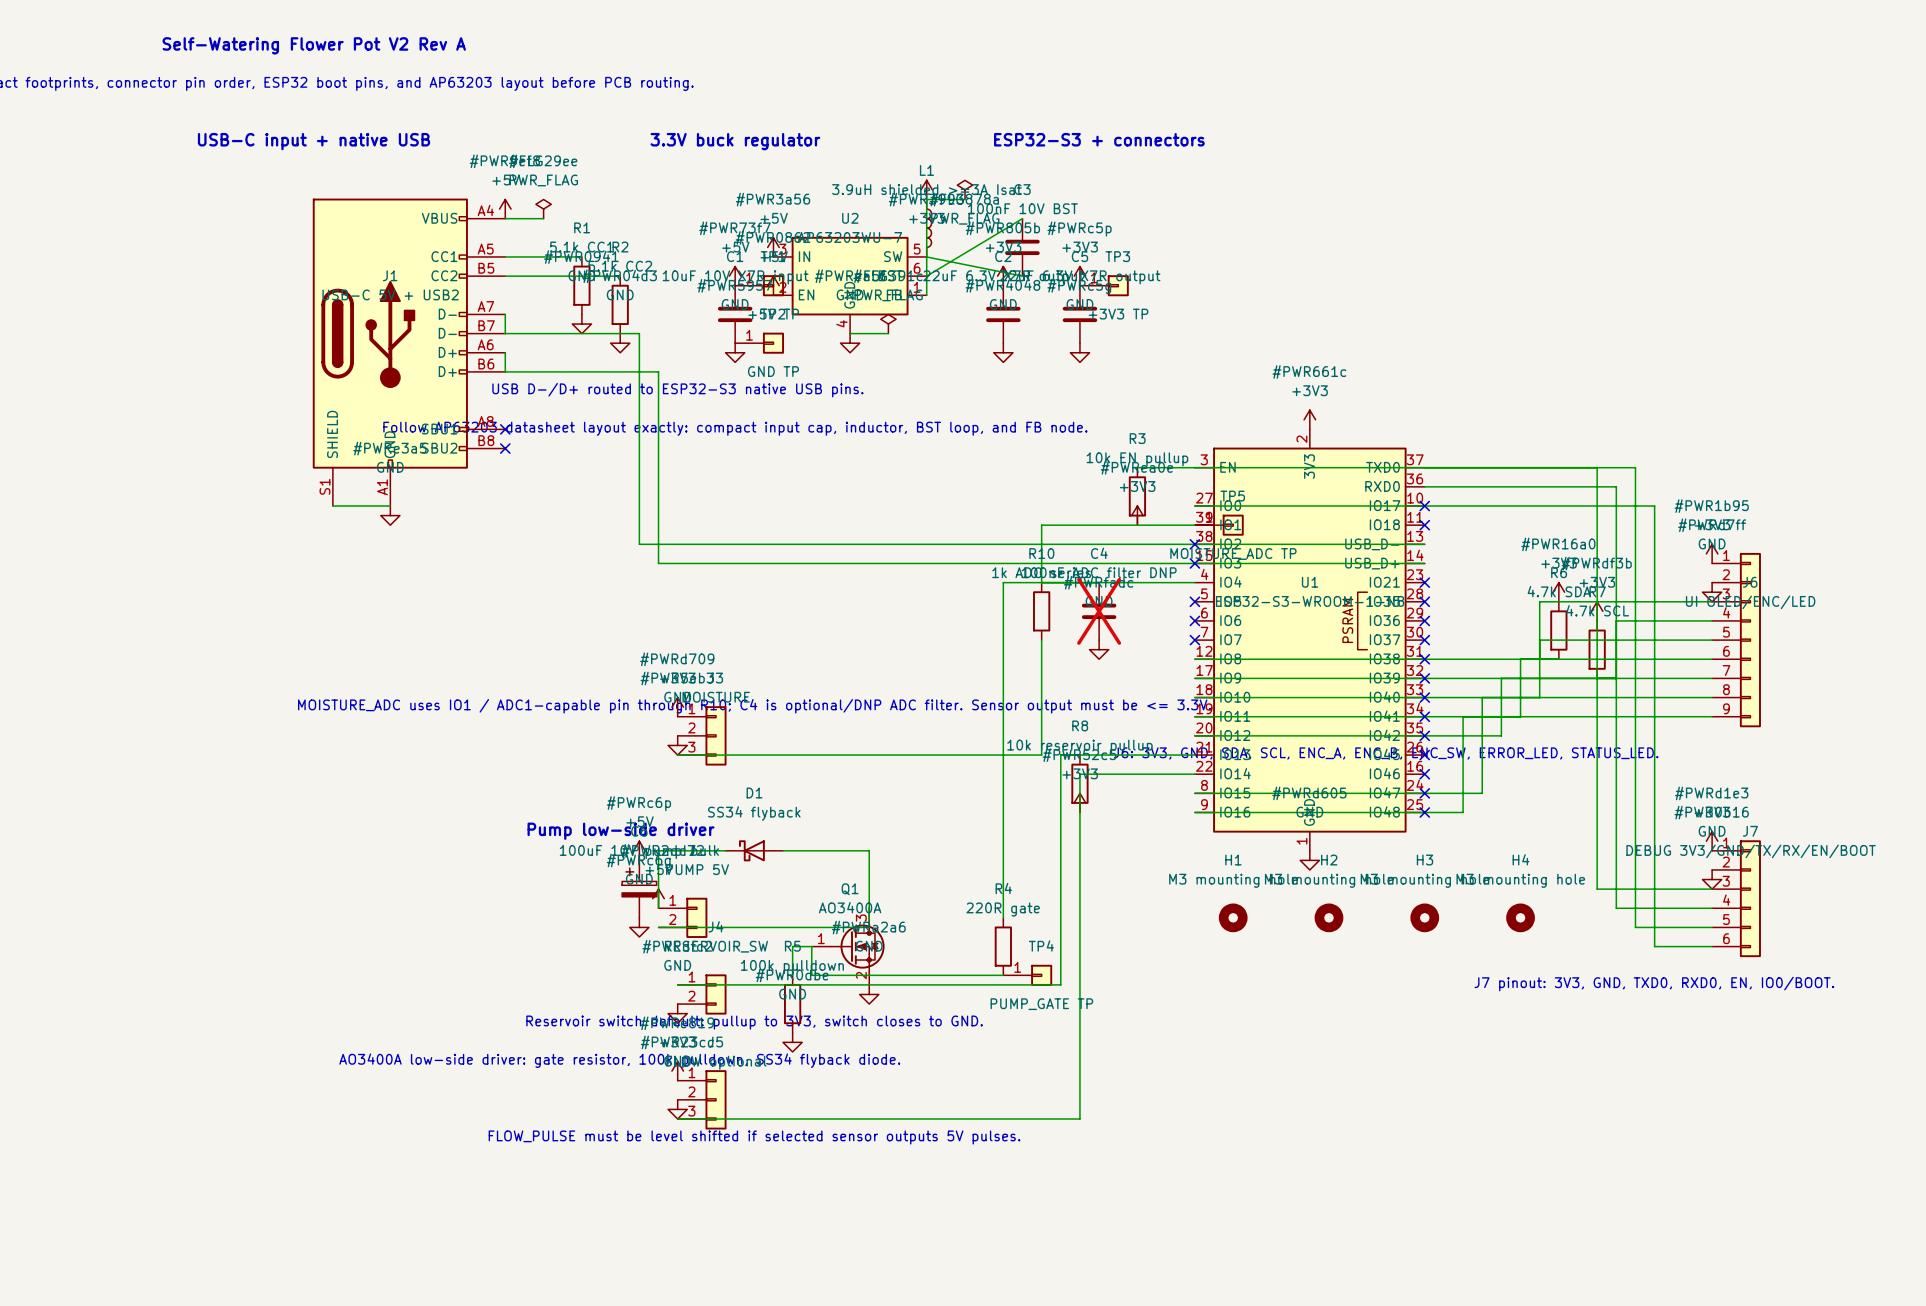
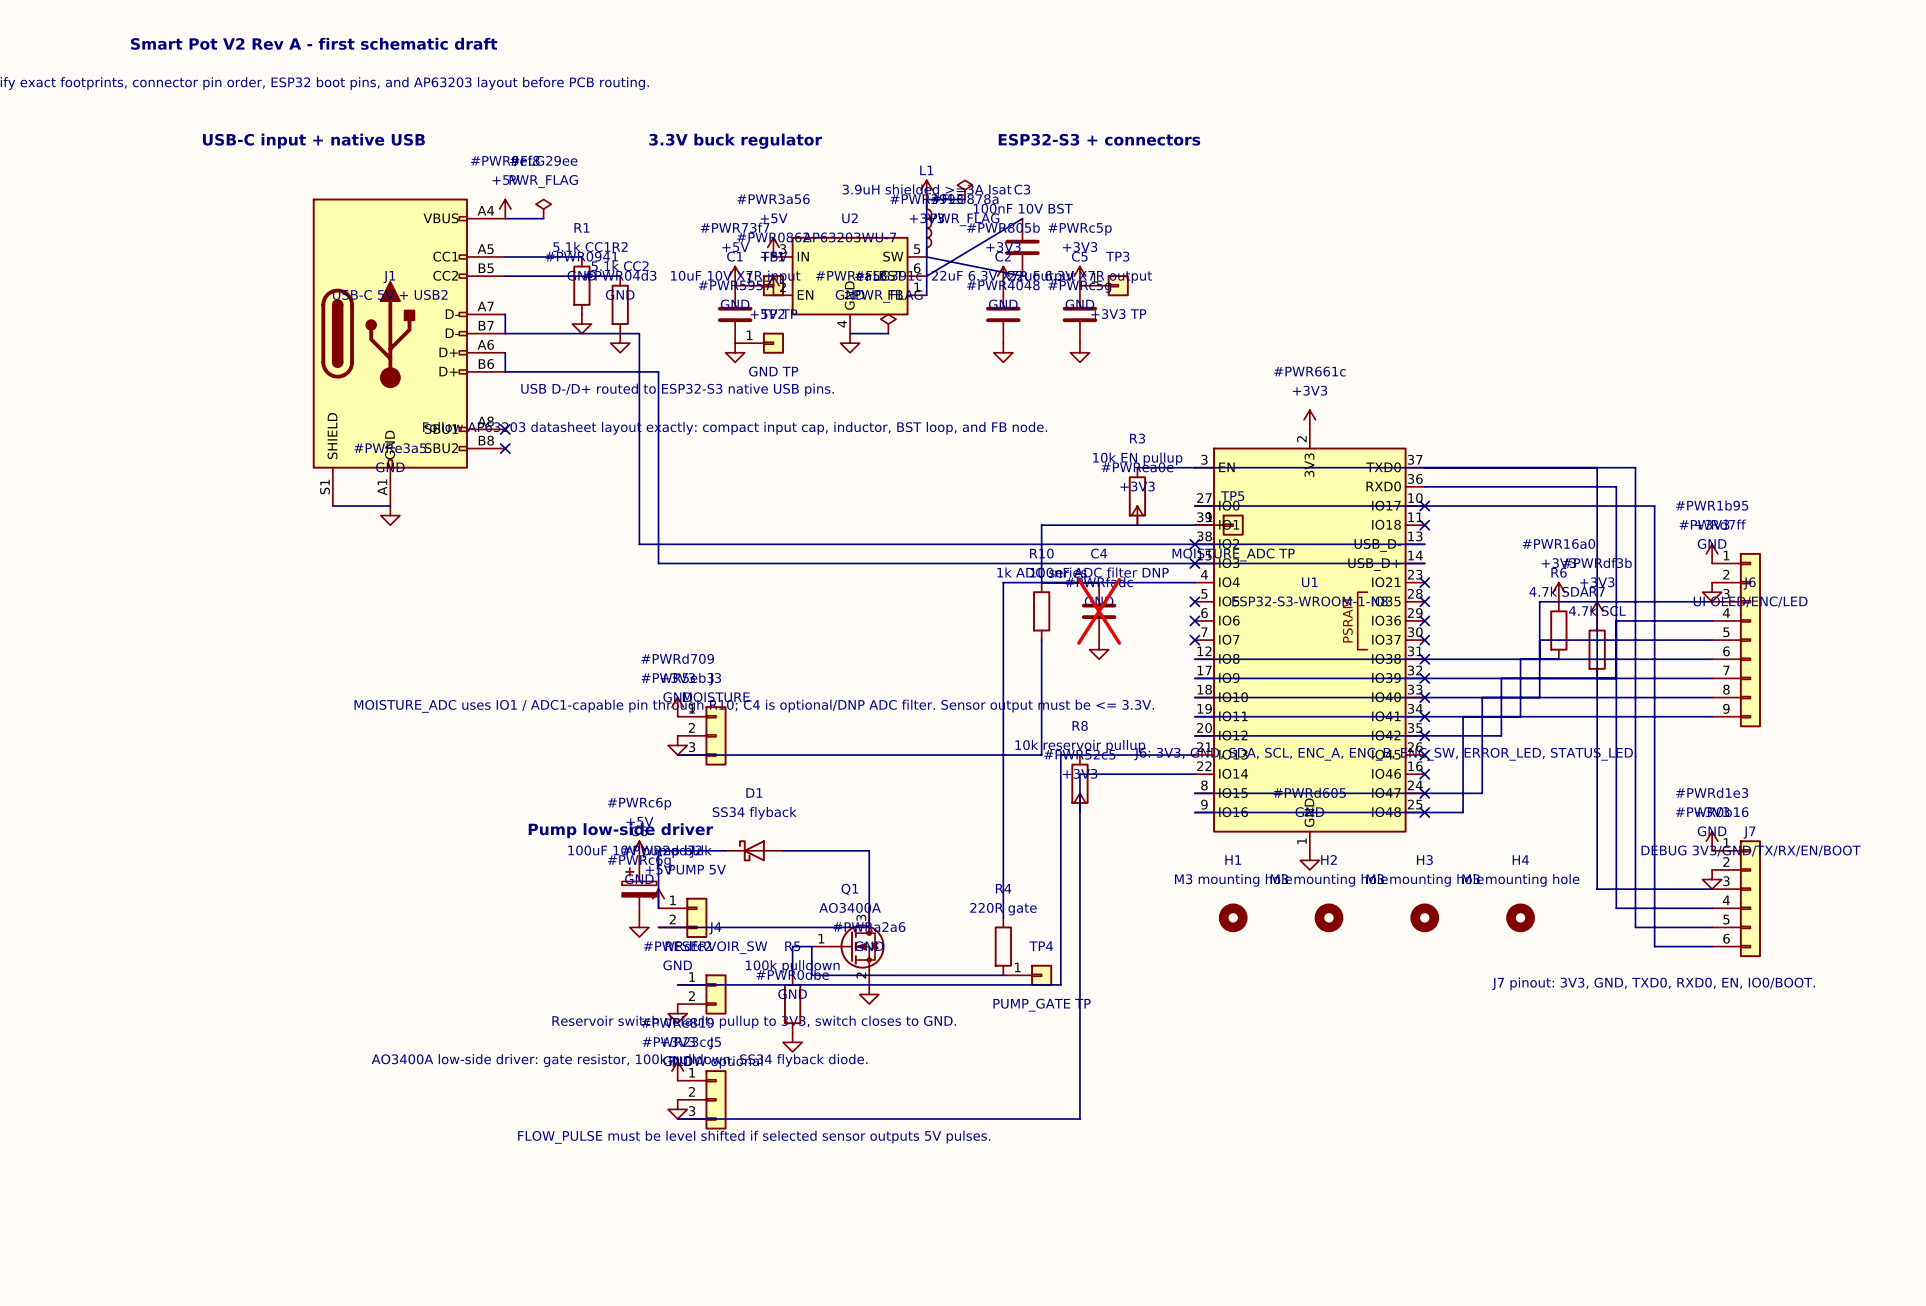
text: Self-Watering Flower Pot V2 Rev A (314, 45) -> Smart Pot V2 Rev A - first schematic draft (314, 43)

